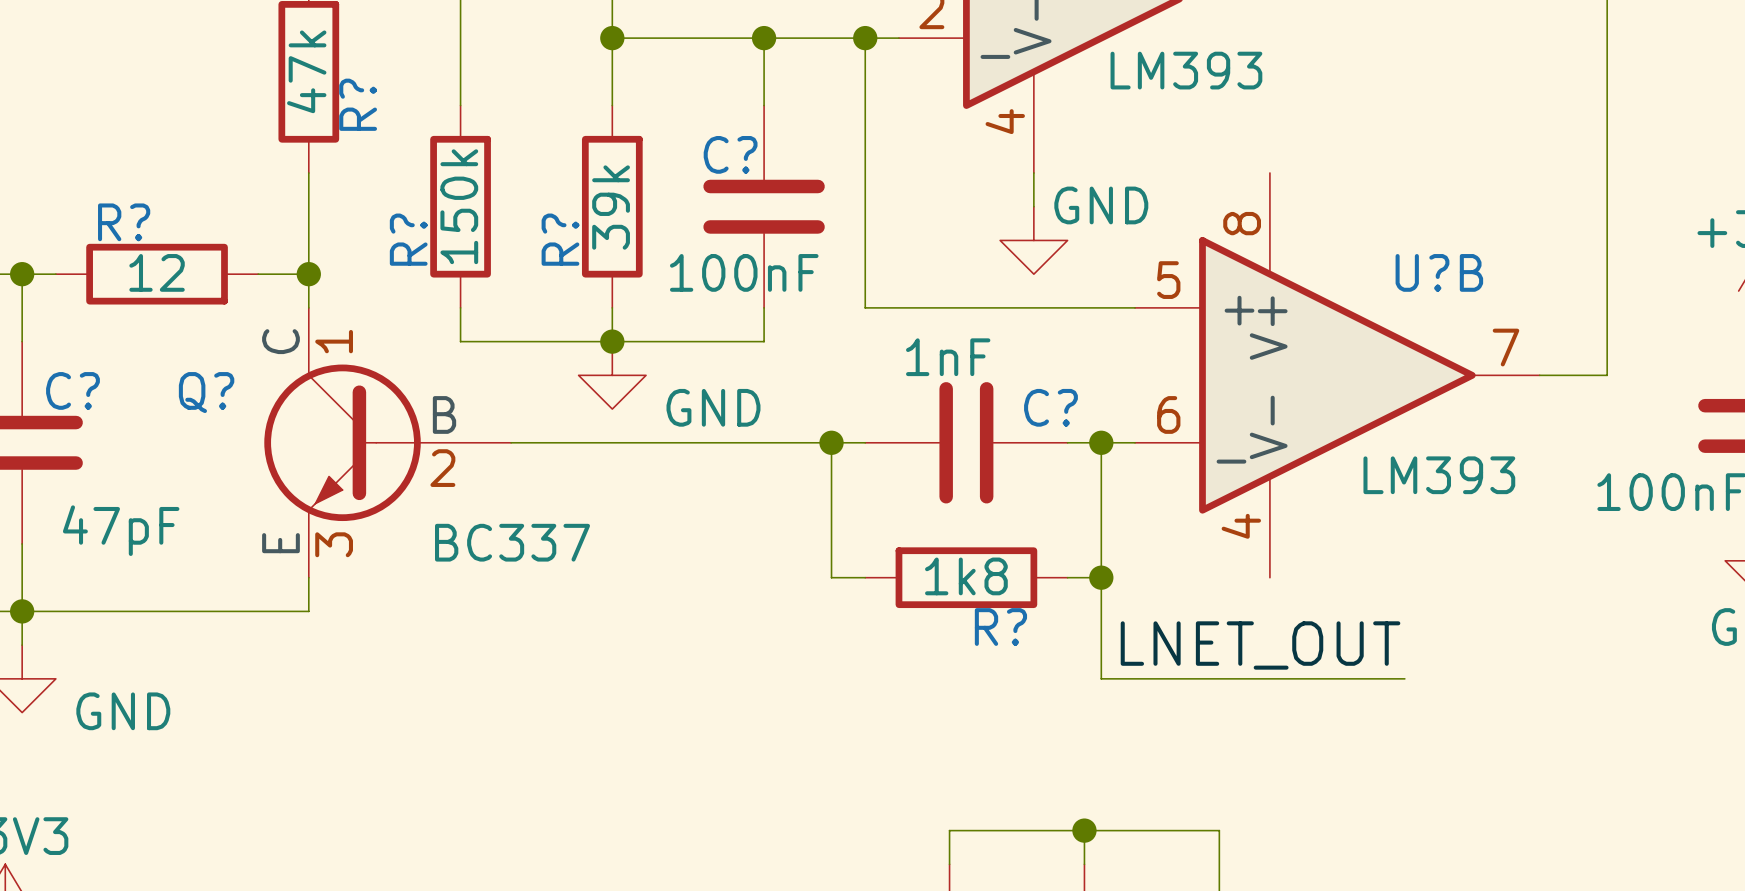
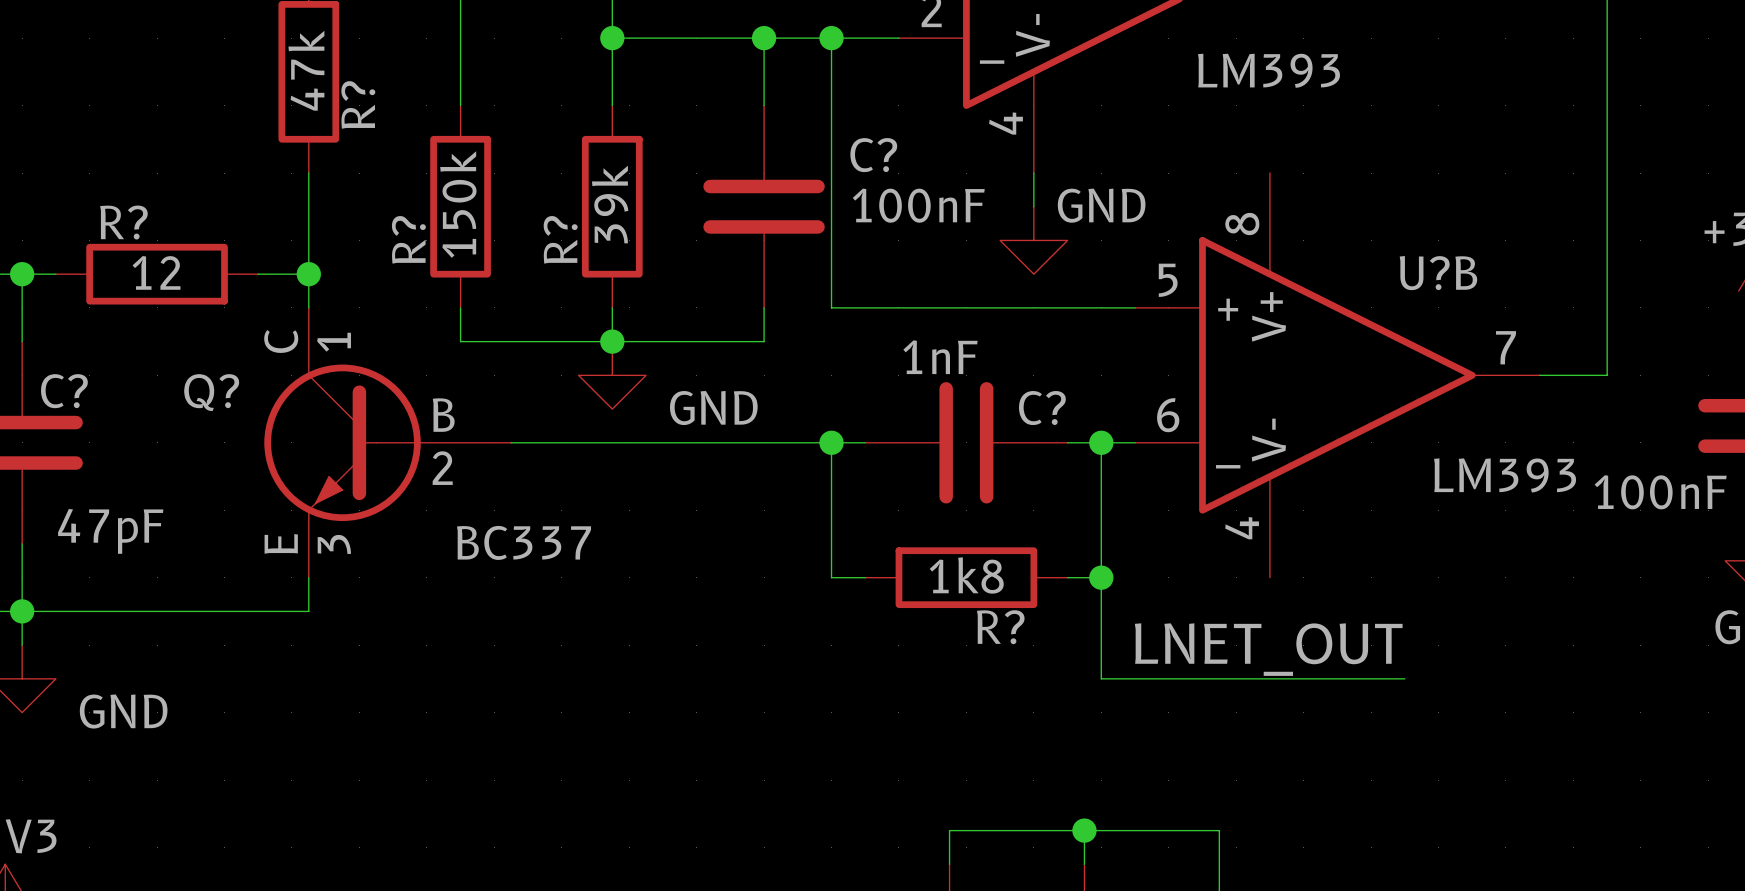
wire: (865, 38) (865, 307) -> (831, 38) (831, 307) (865, 307)
junction position: (865, 38) -> (831, 38)
part value position: LM393 (1186, 70) -> LM393 (1269, 70)
C? name position: C? (730, 154) -> C? (873, 155)
C? value position: 100nF (744, 272) -> 100nF (918, 205)
U?B value position: LM393 (1439, 475) -> LM393 (1505, 475)

